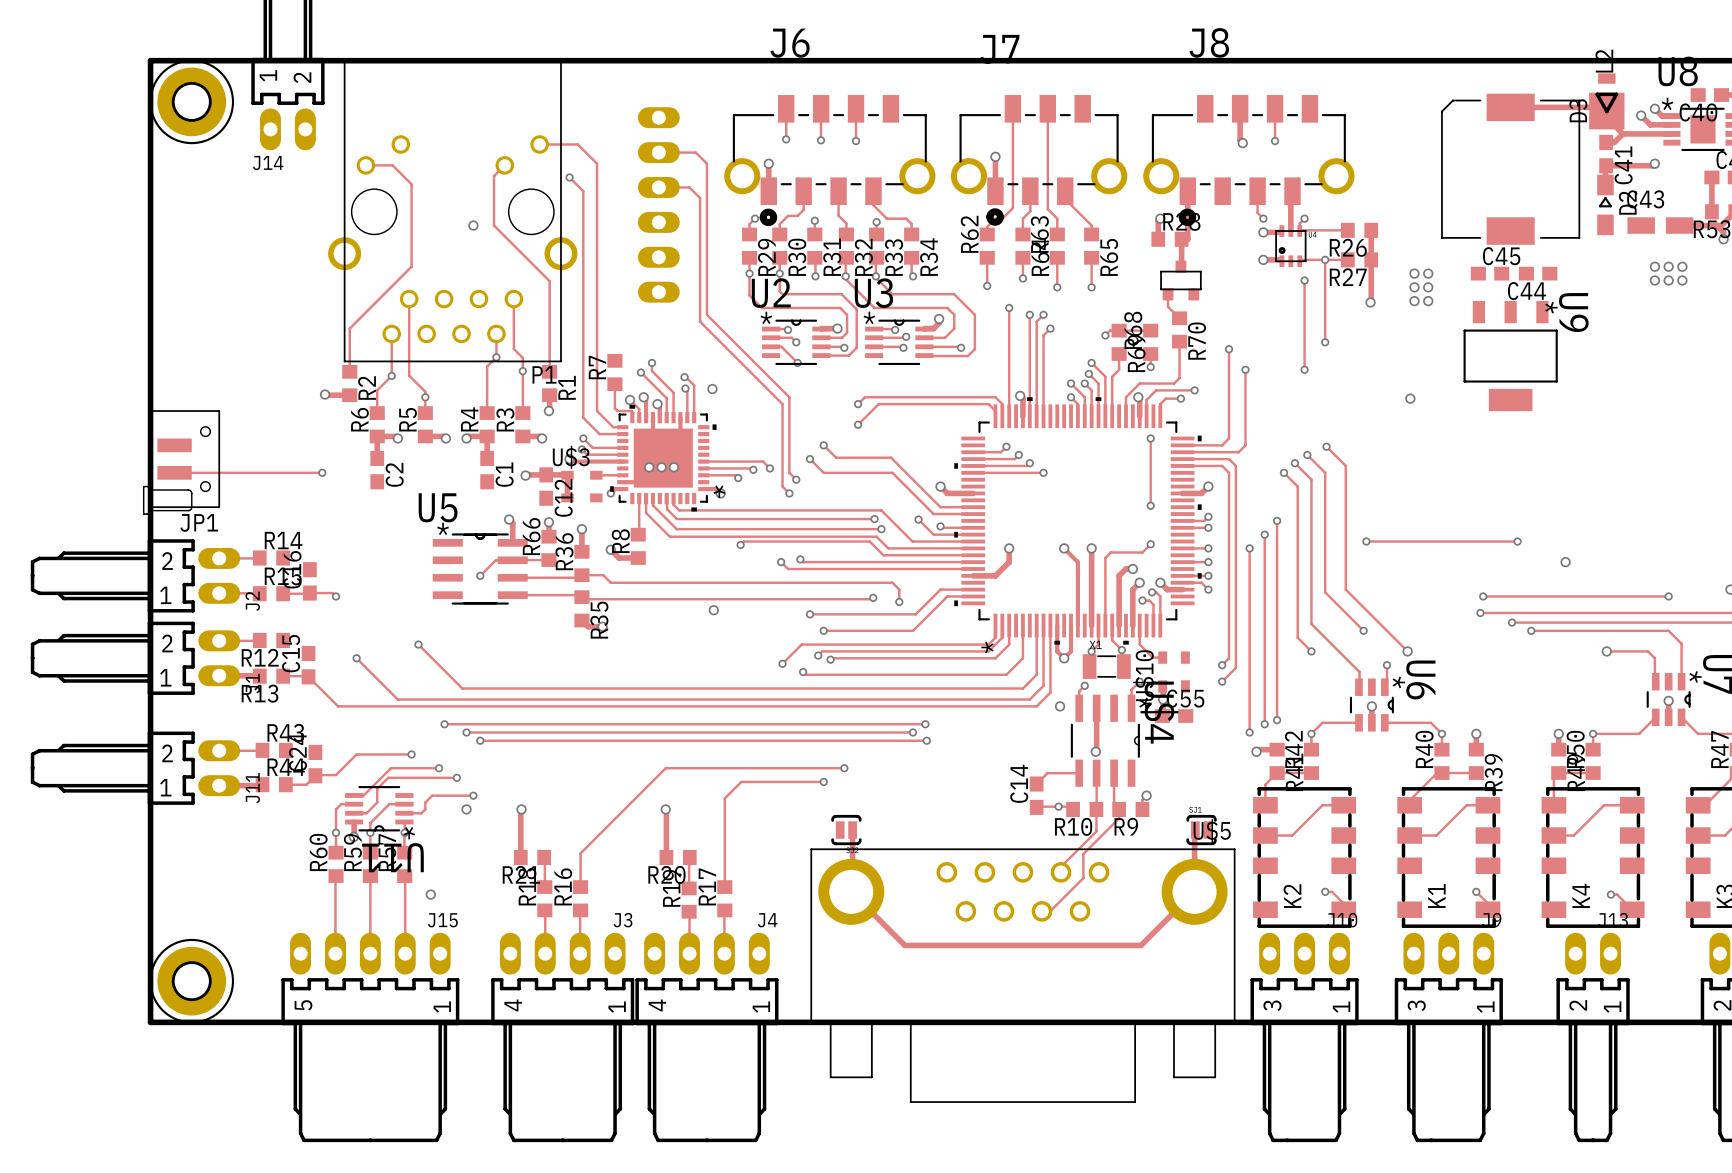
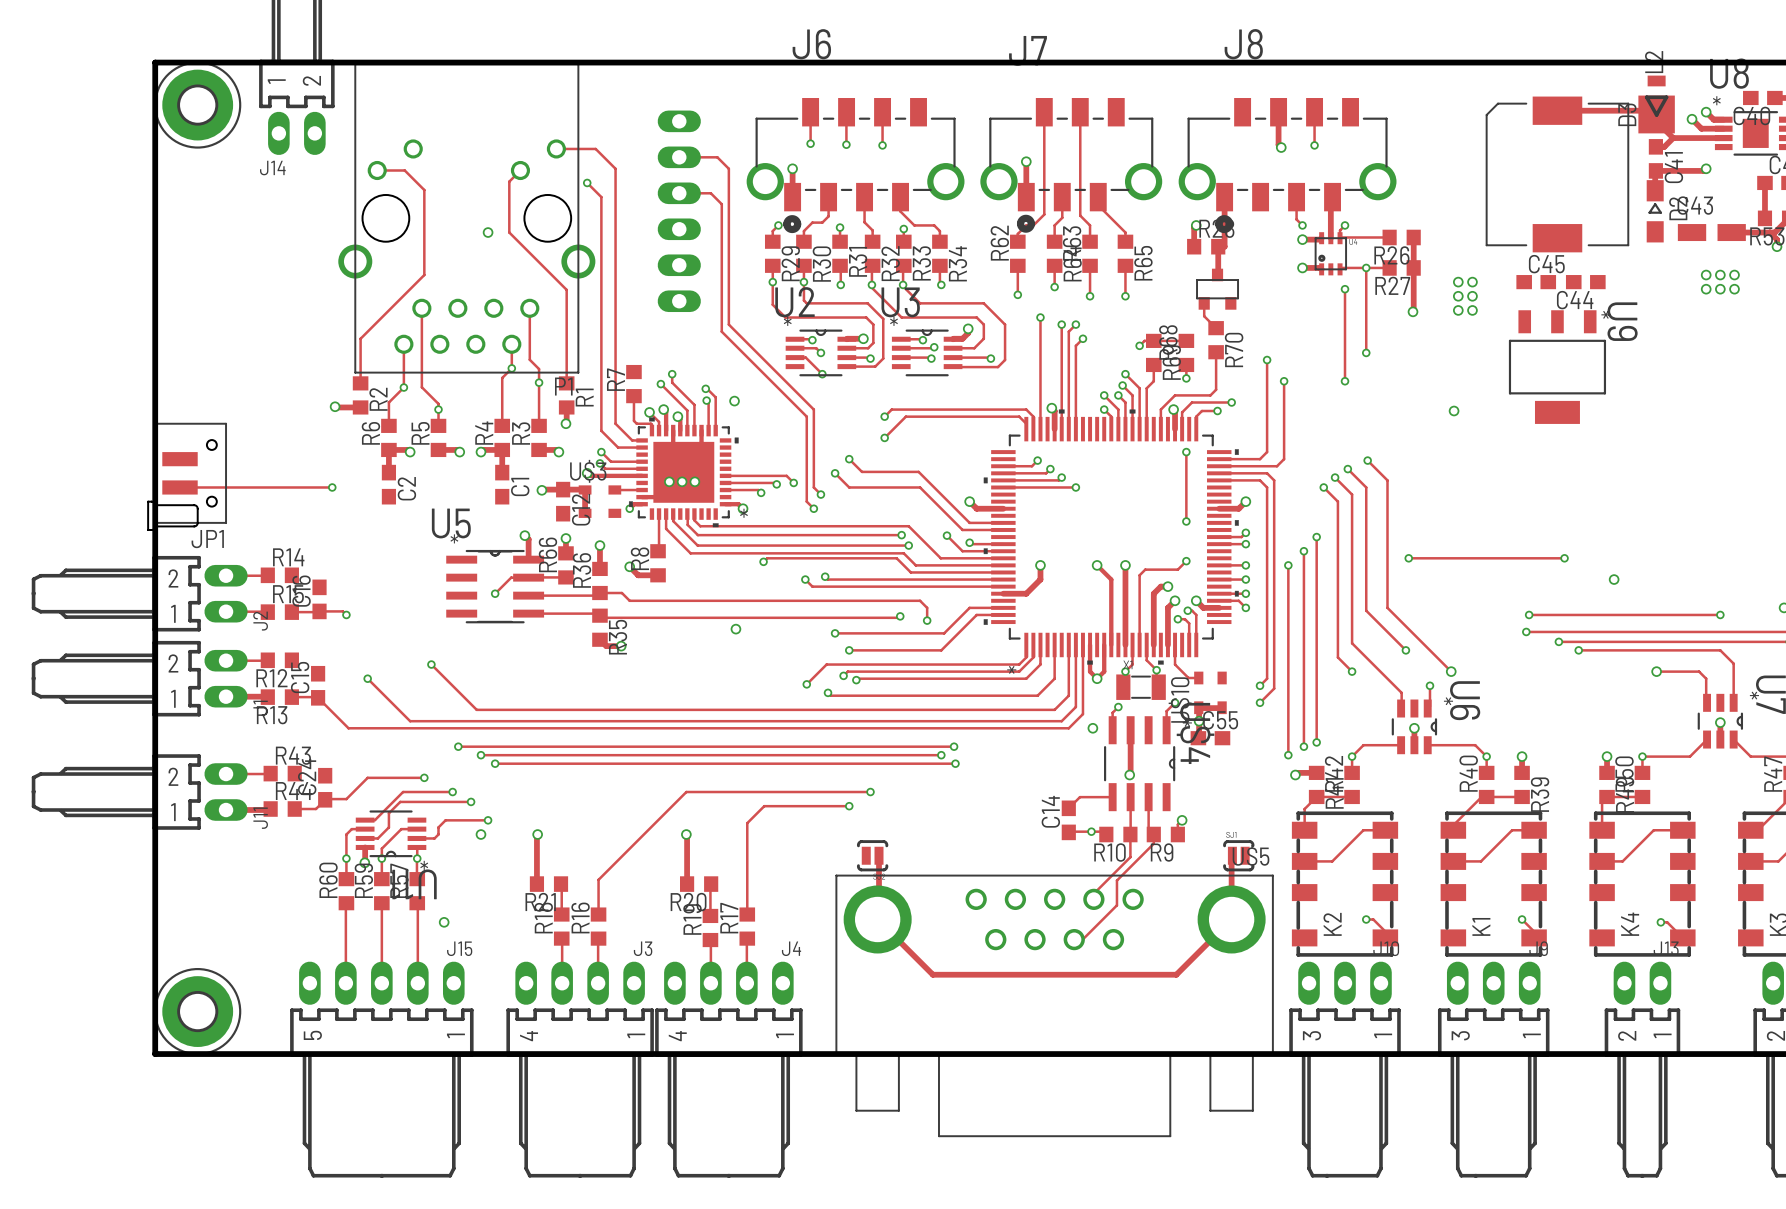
track: none -> (1222, 707) (1199, 708)

